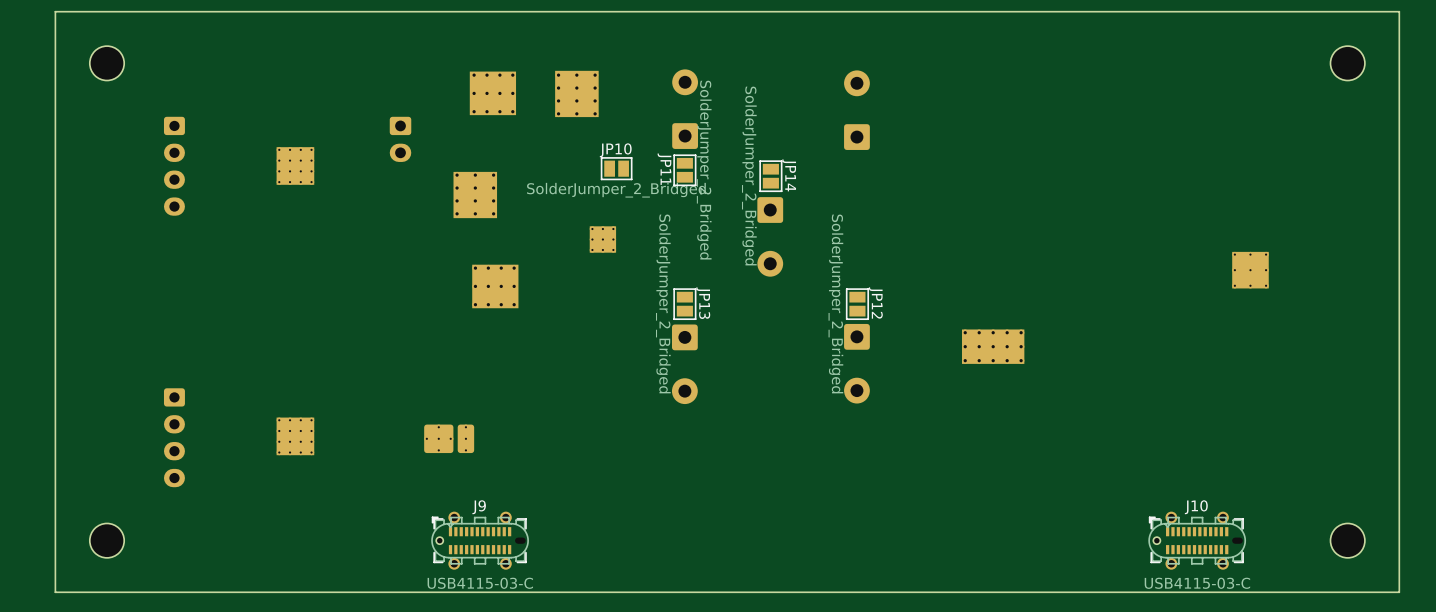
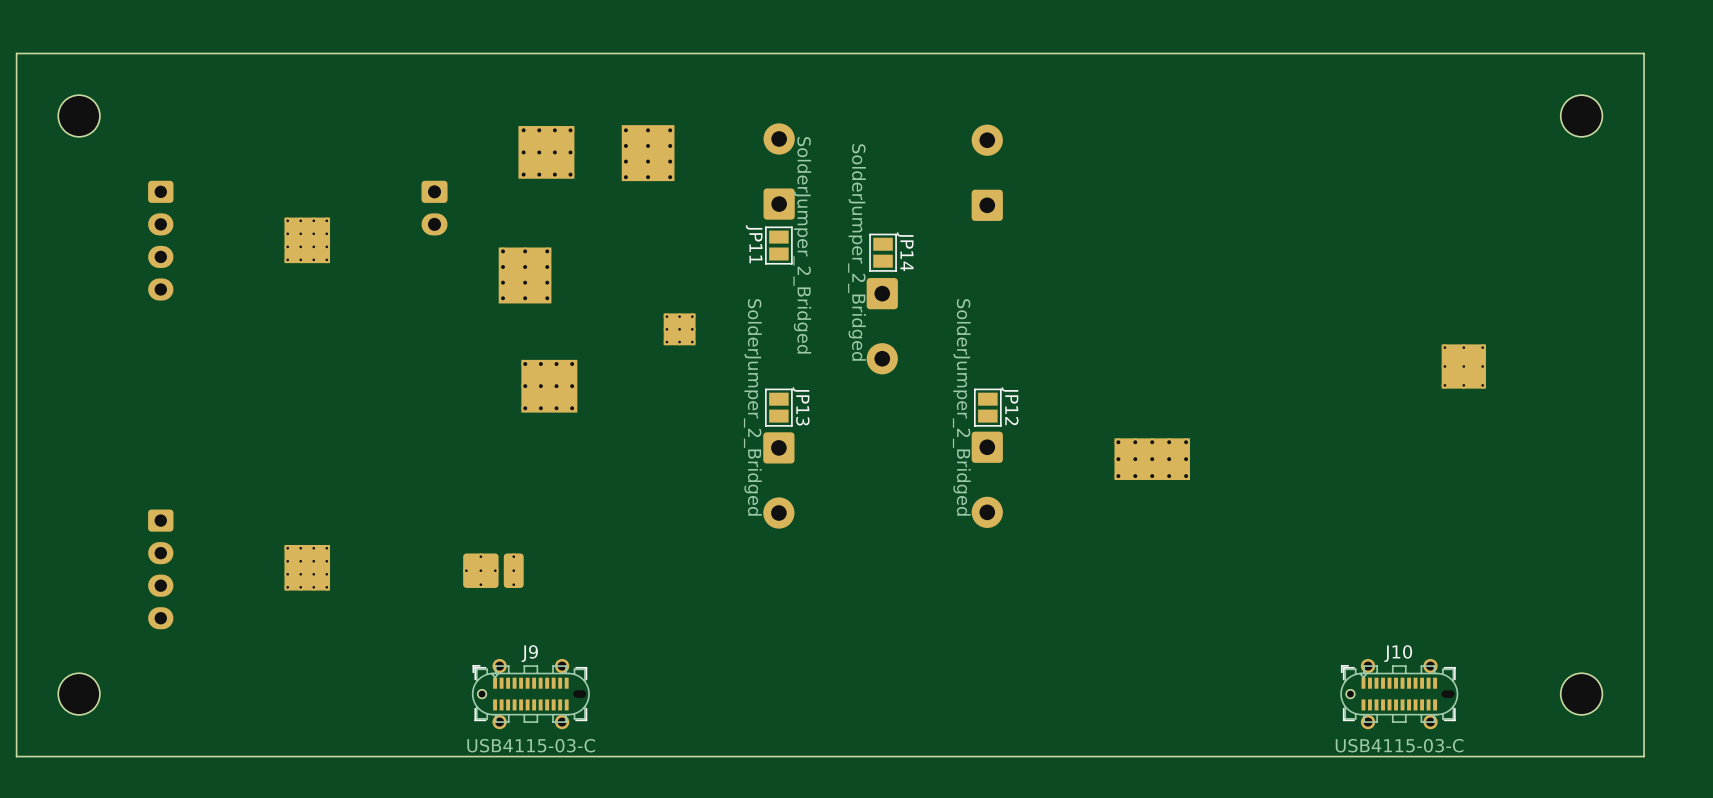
JP10: SolderJumper_2_Bridged (616, 168) -> none

